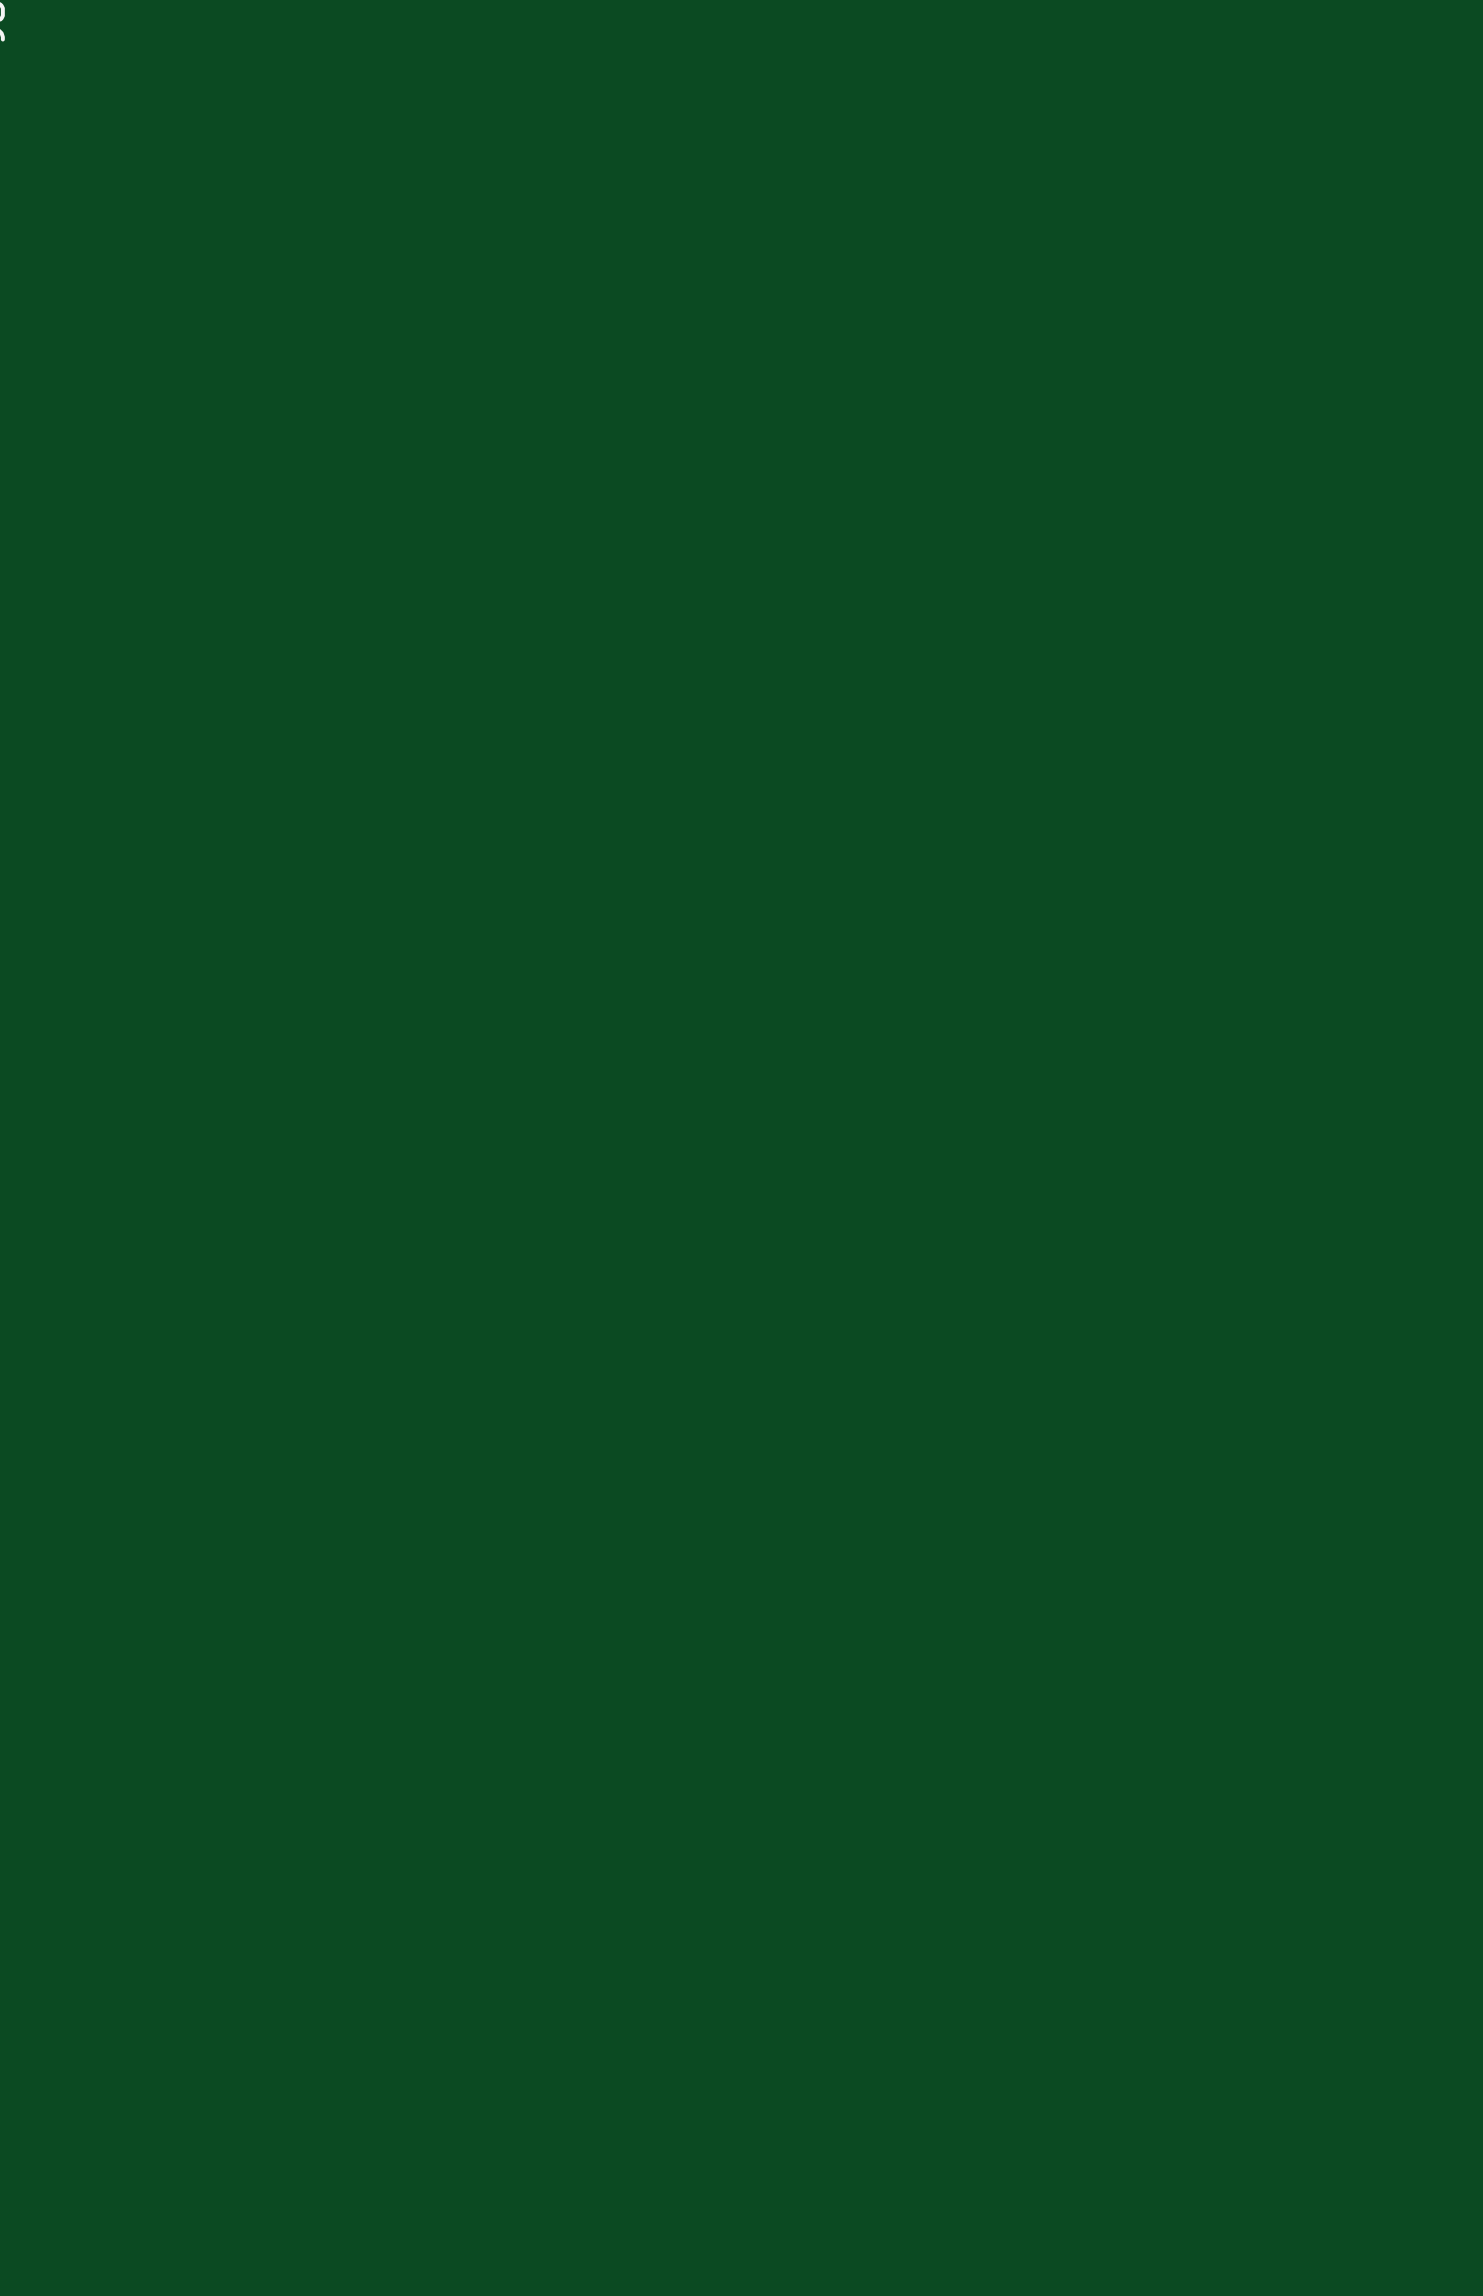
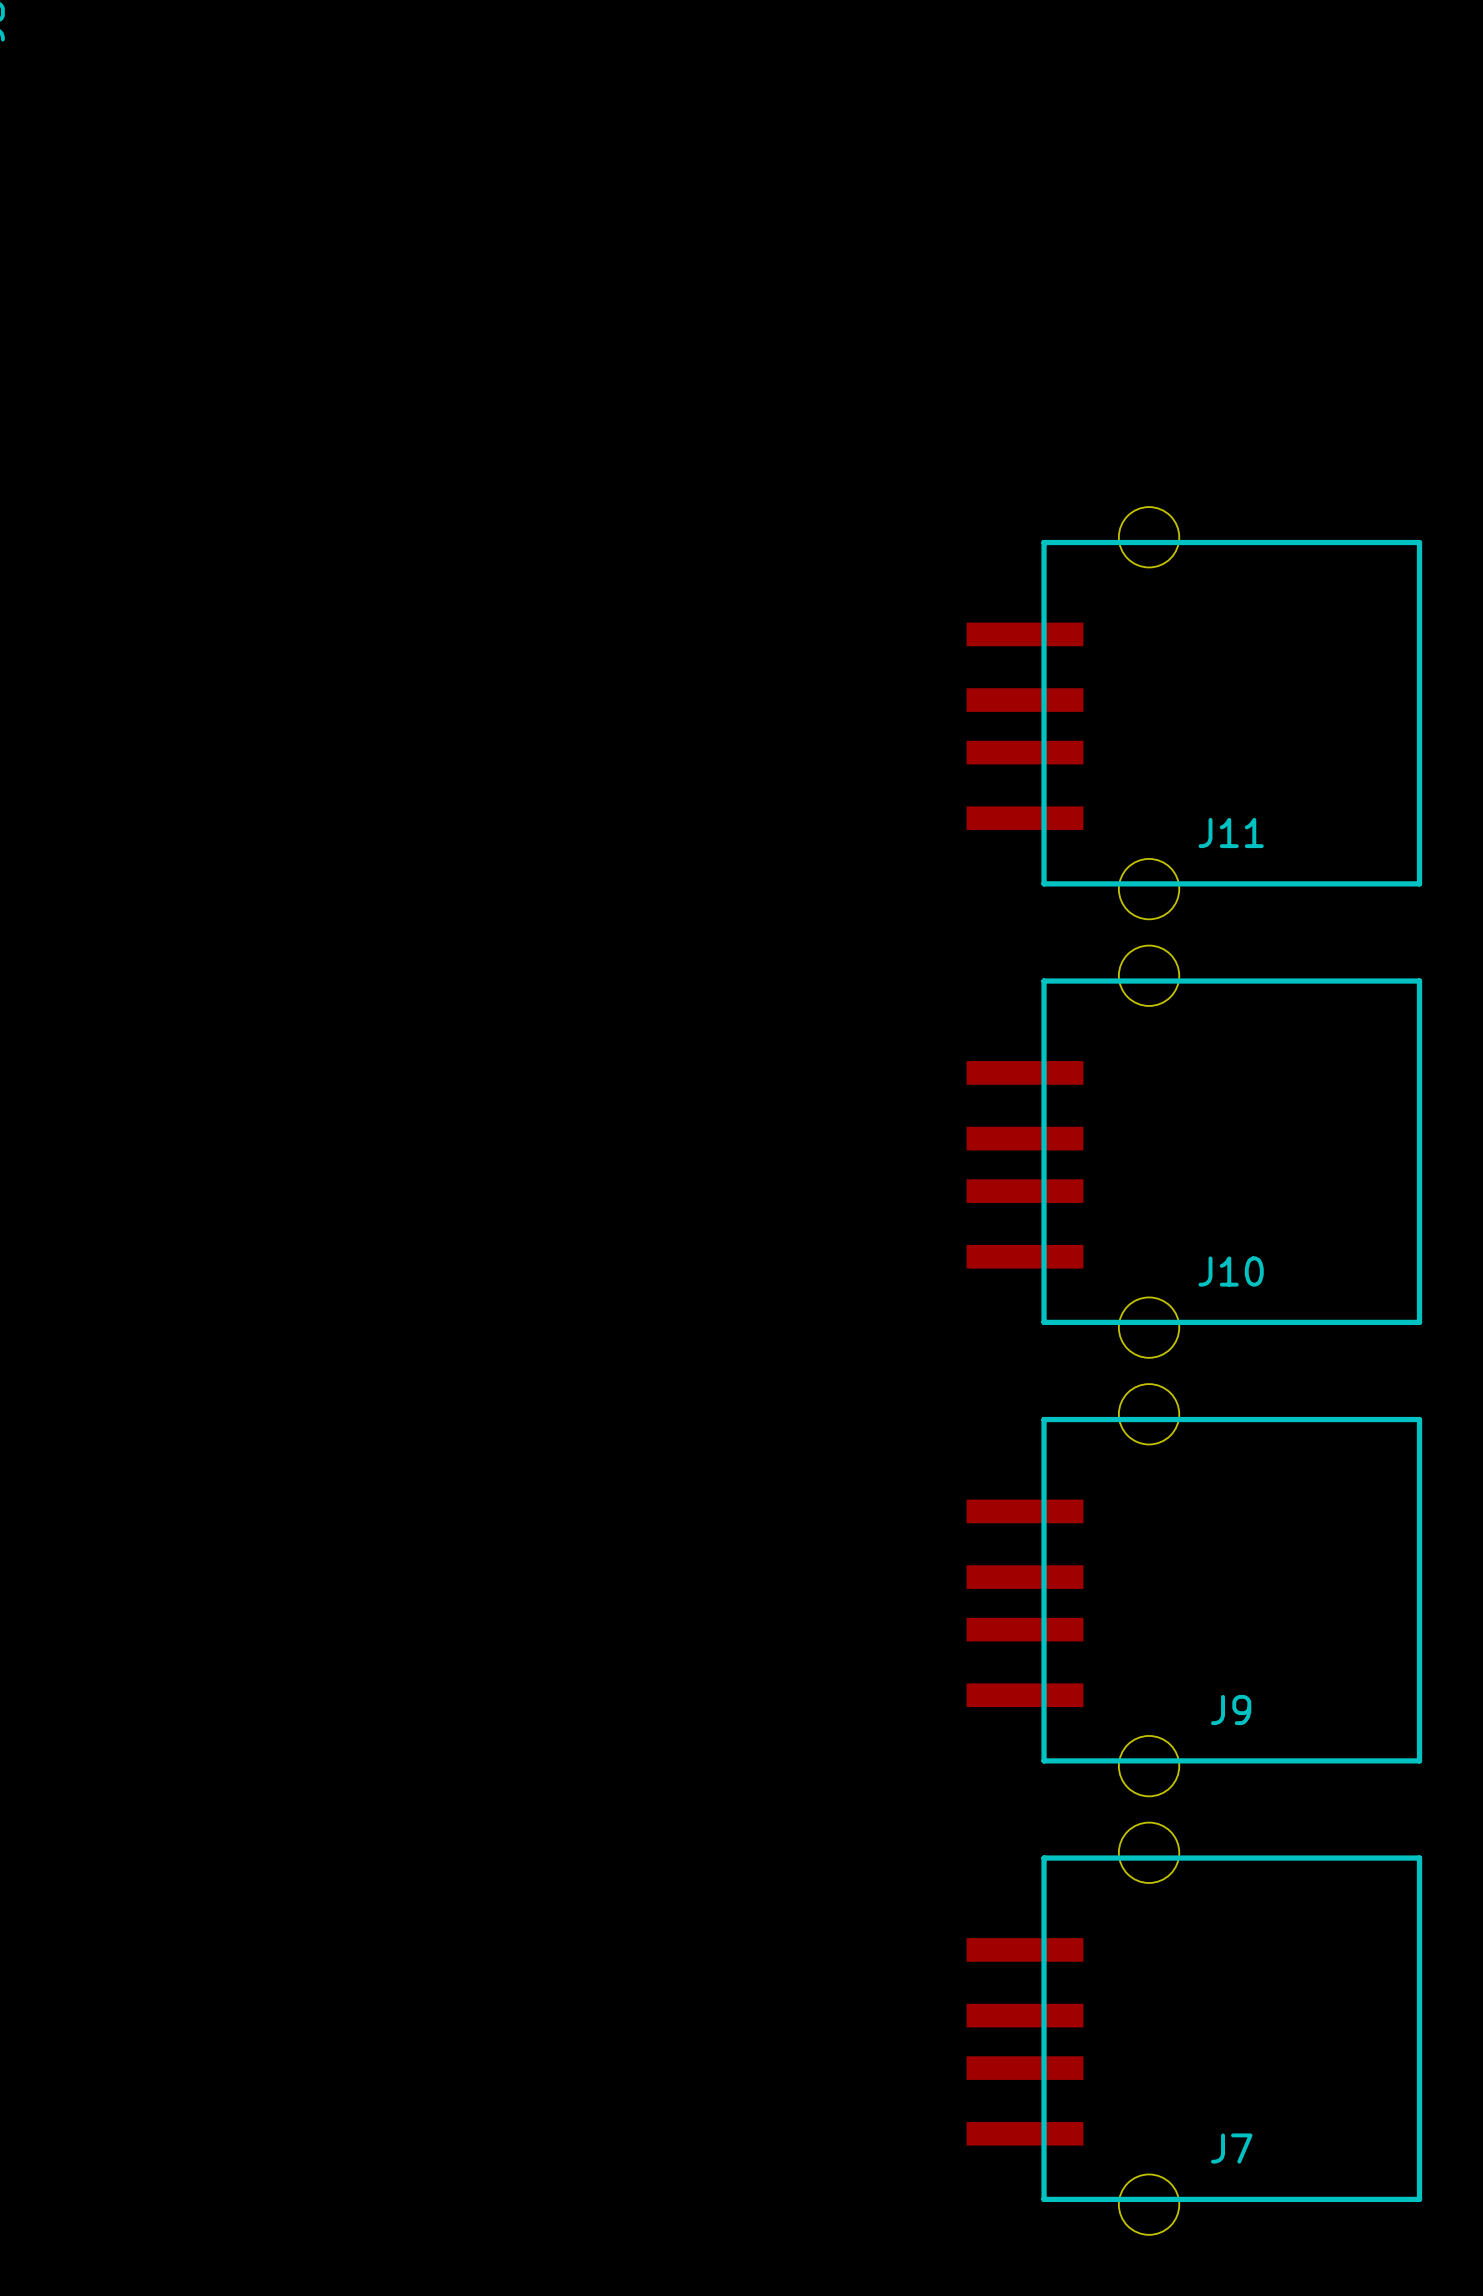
J11: none -> (1194, 713)
J10: none -> (1194, 1151)
J9: none -> (1194, 1590)
J7: none -> (1194, 2028)

